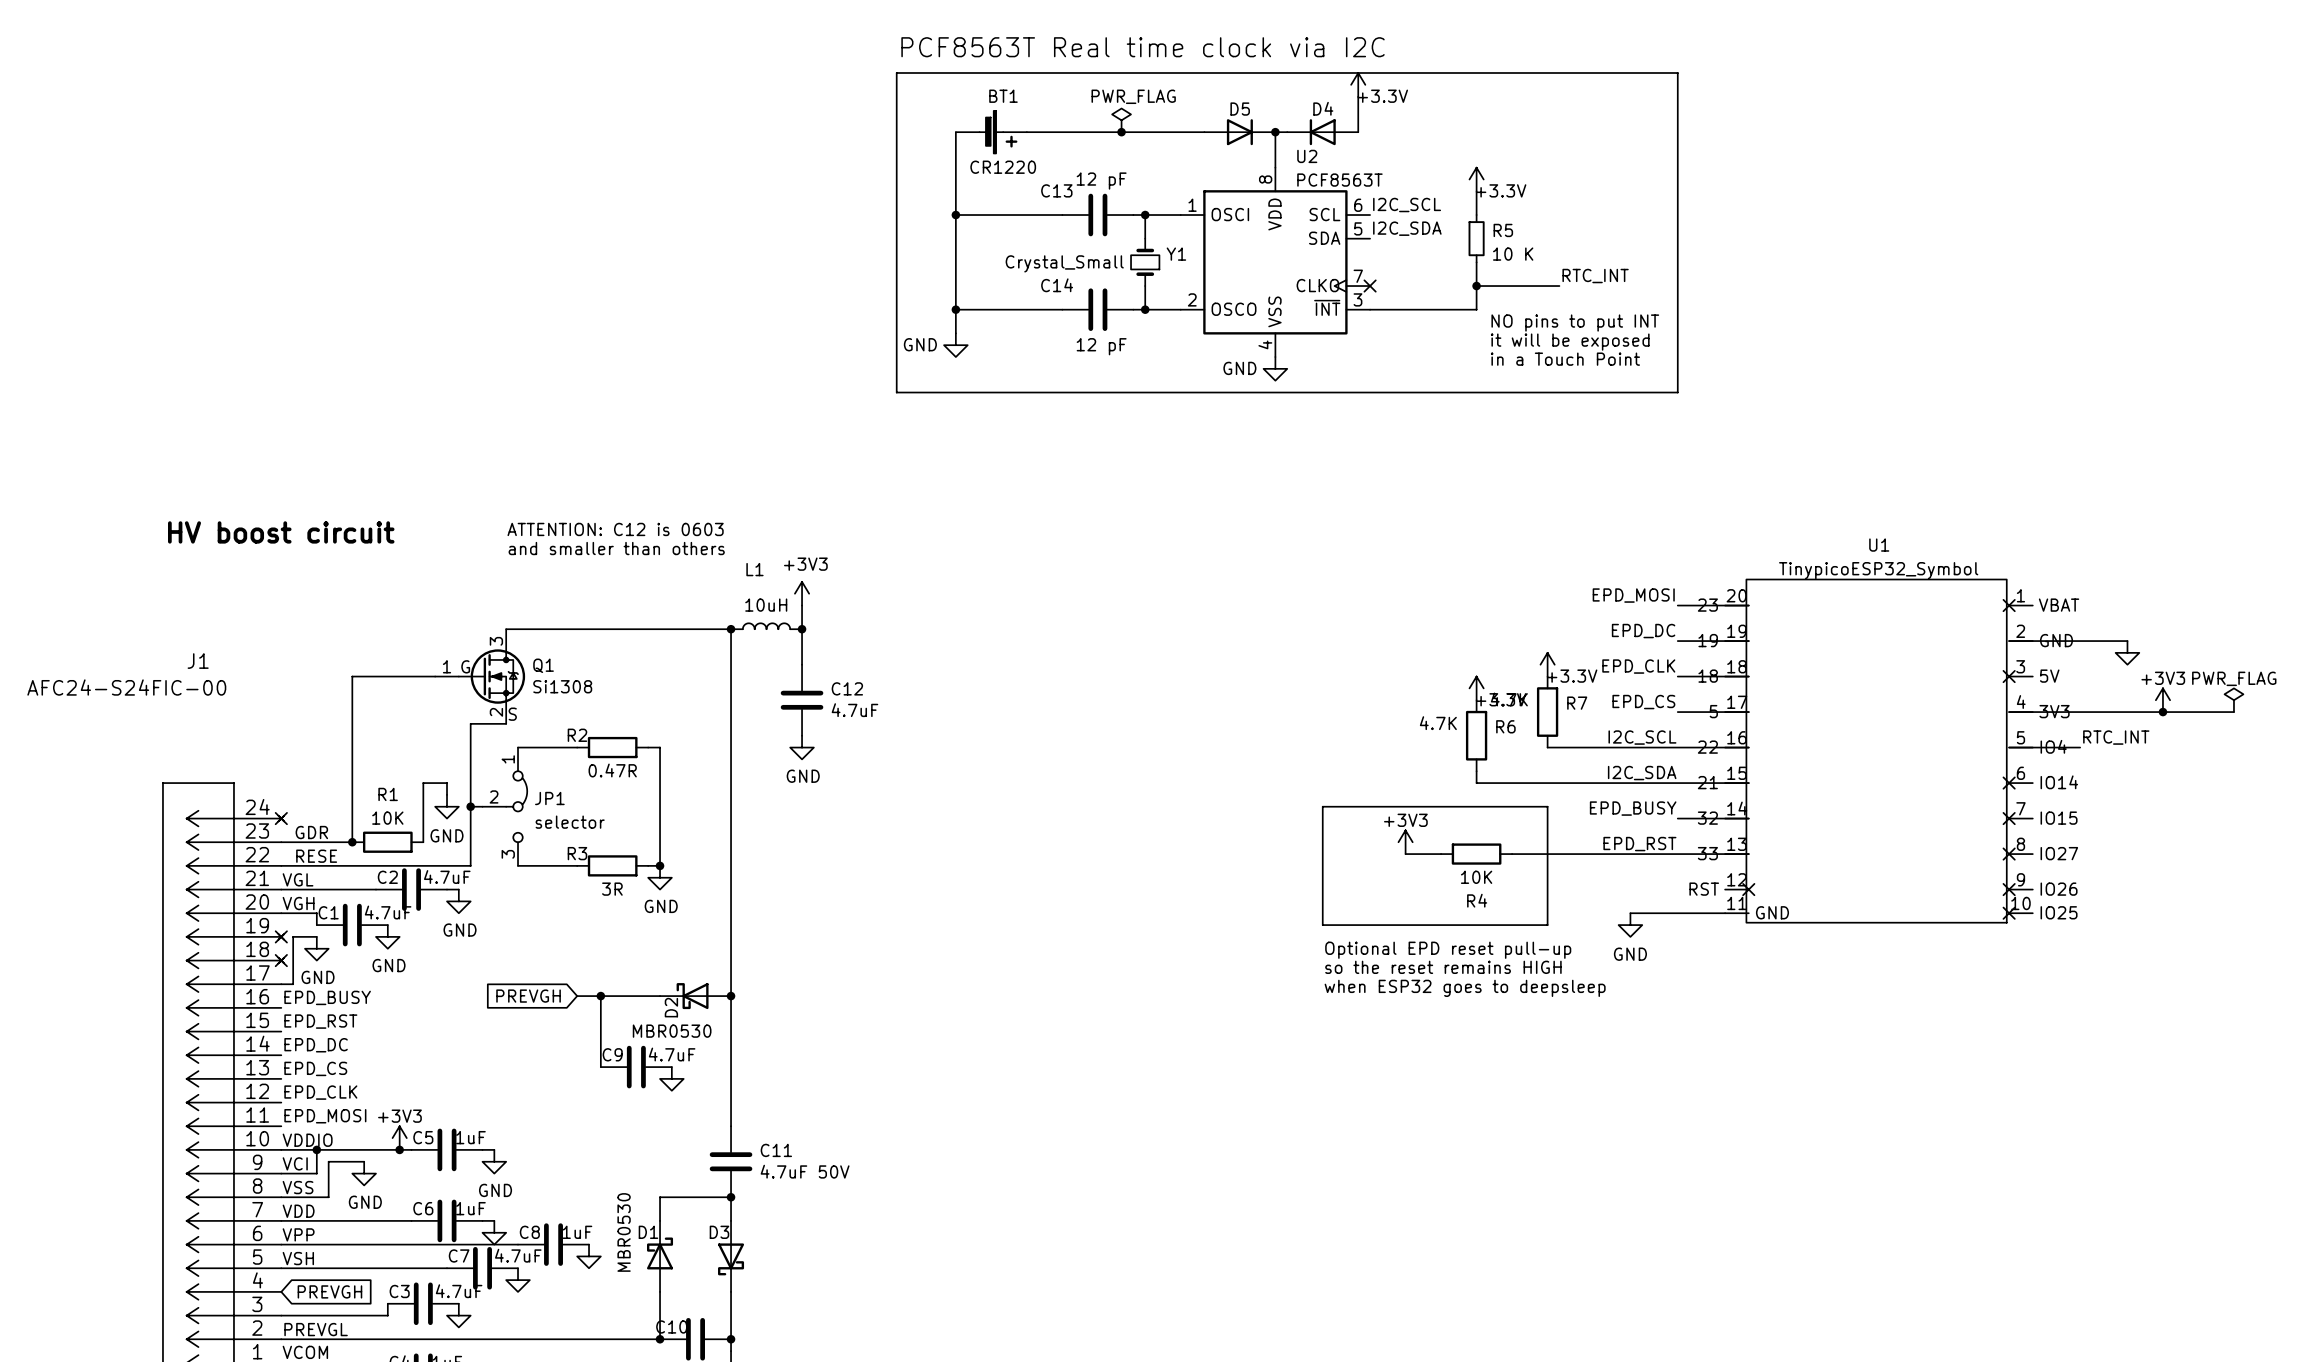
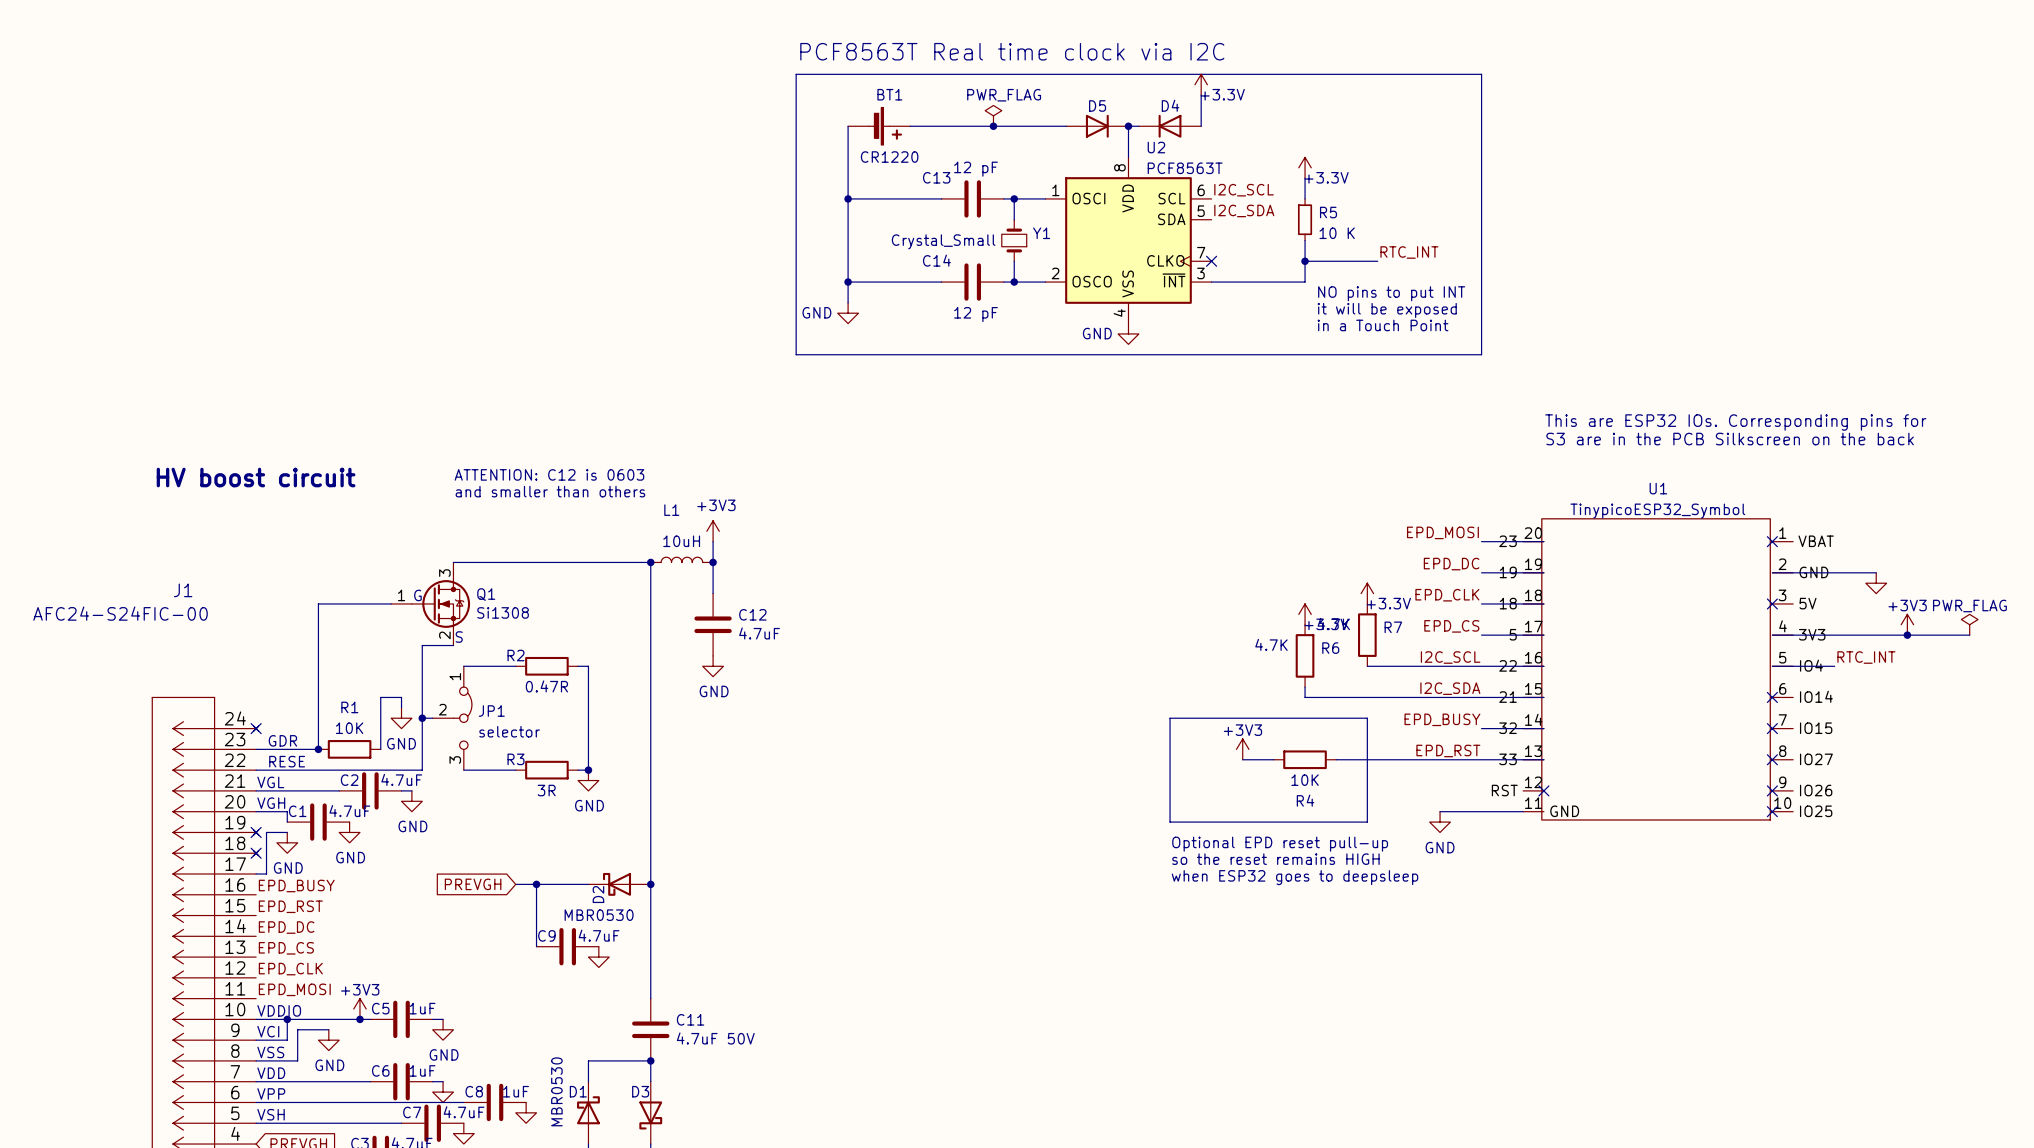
text: none -> This are ESP32 IOs. Corresponding pins for (1735, 422)
text: none -> S3 are in the PCB Silkscreen on the back (1730, 439)

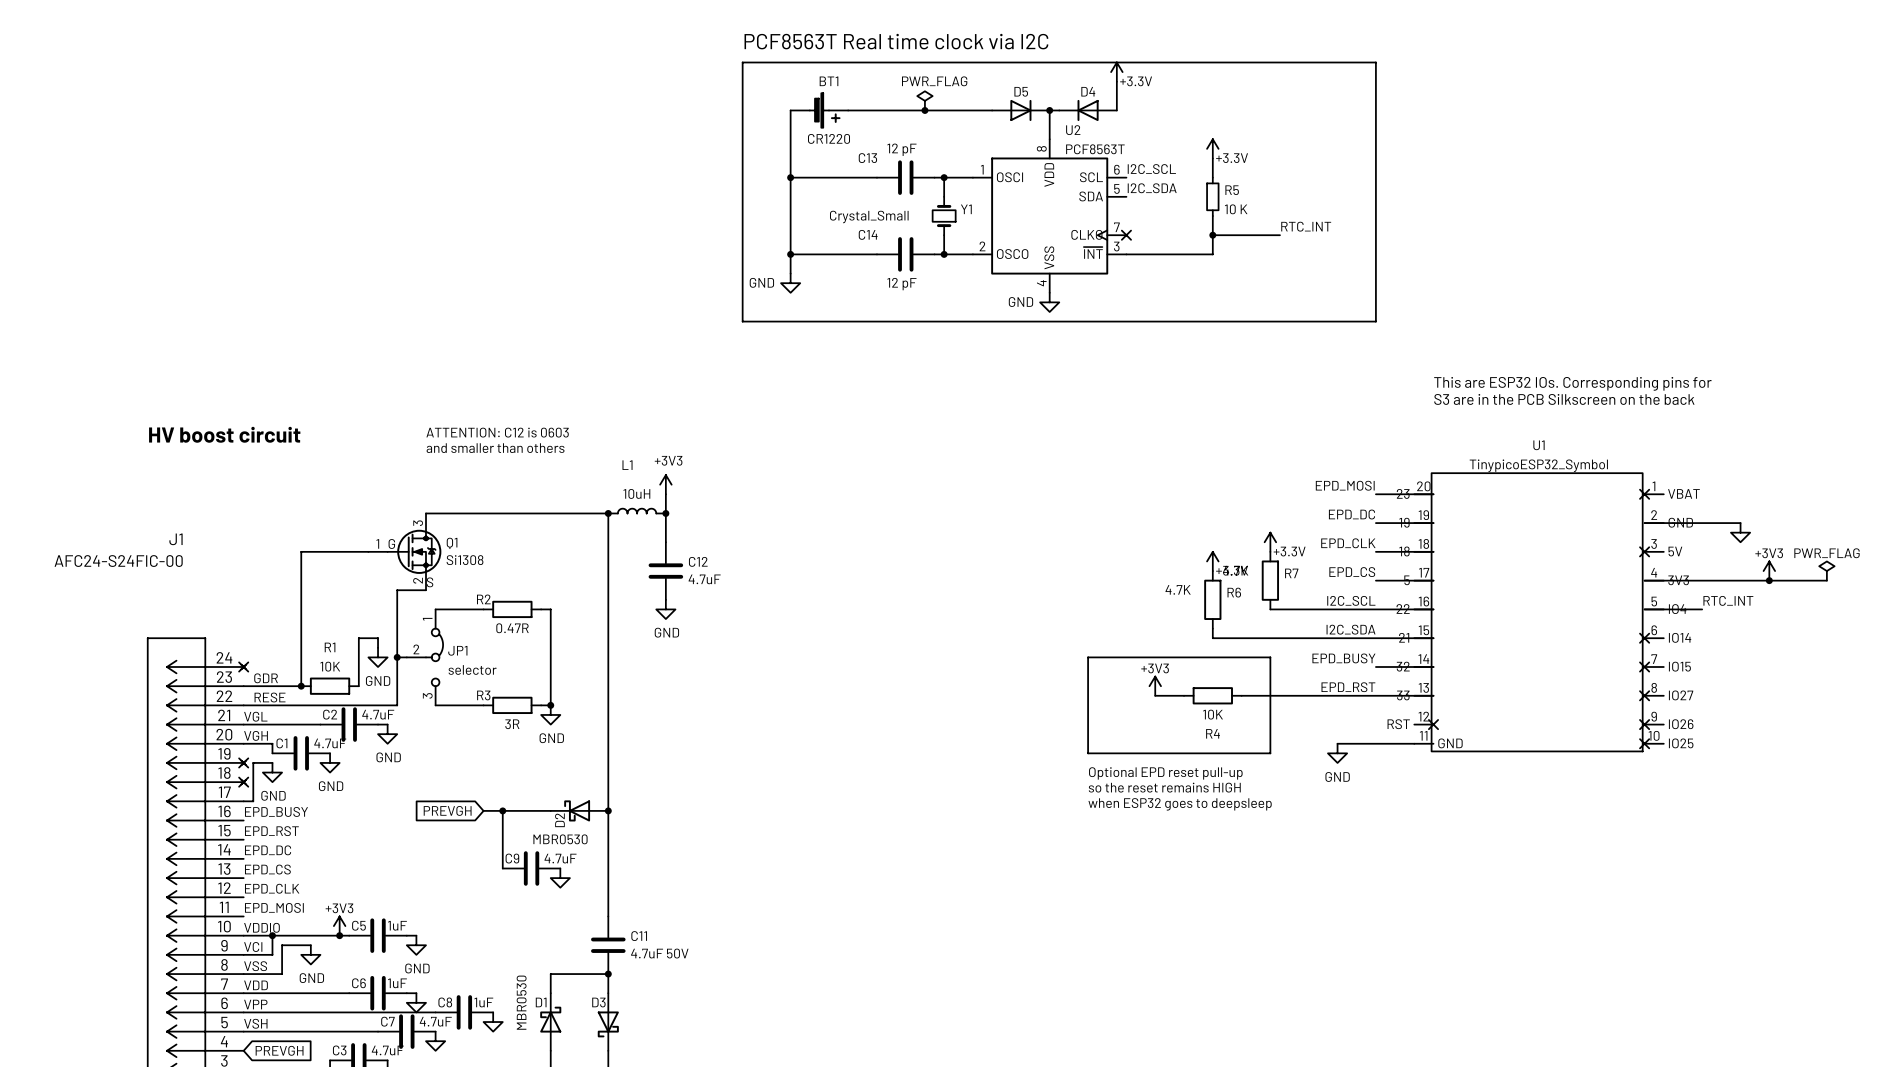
text: NO pins to put INT (1391, 293) -> none
text: it will be exposed (1387, 310) -> none
text: in a Touch Point (1383, 325) -> none

